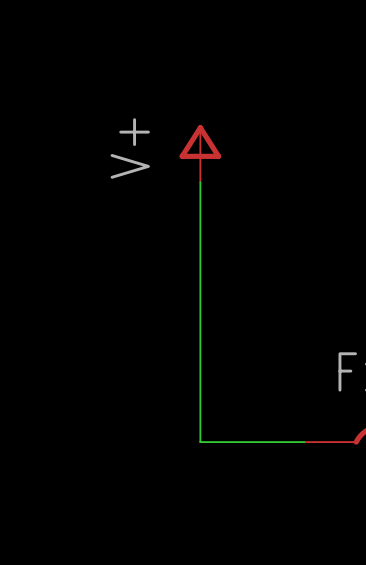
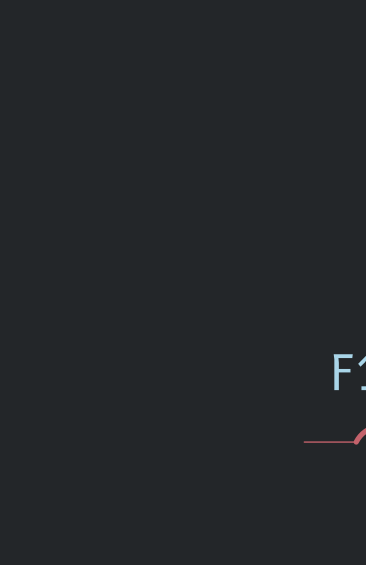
power symbol: V+ (200, 153) -> none
wire: (200, 182) (200, 442) (304, 442) -> none

